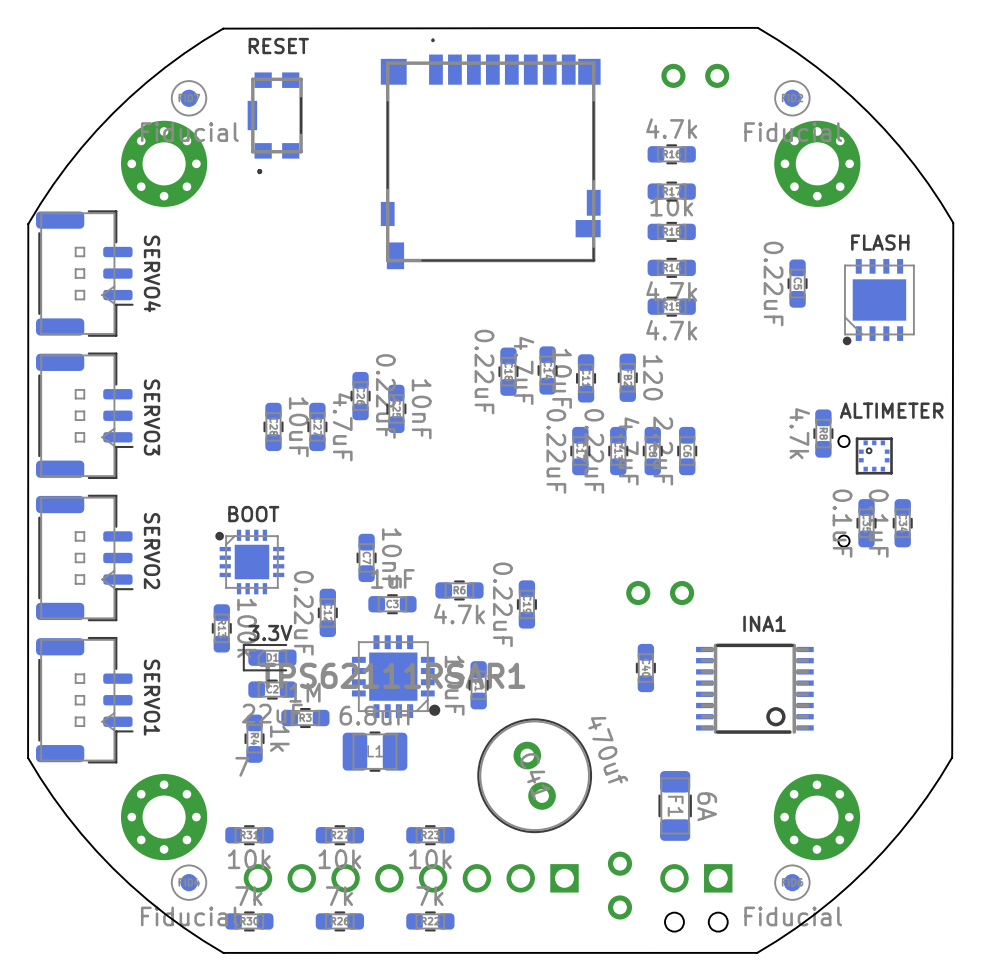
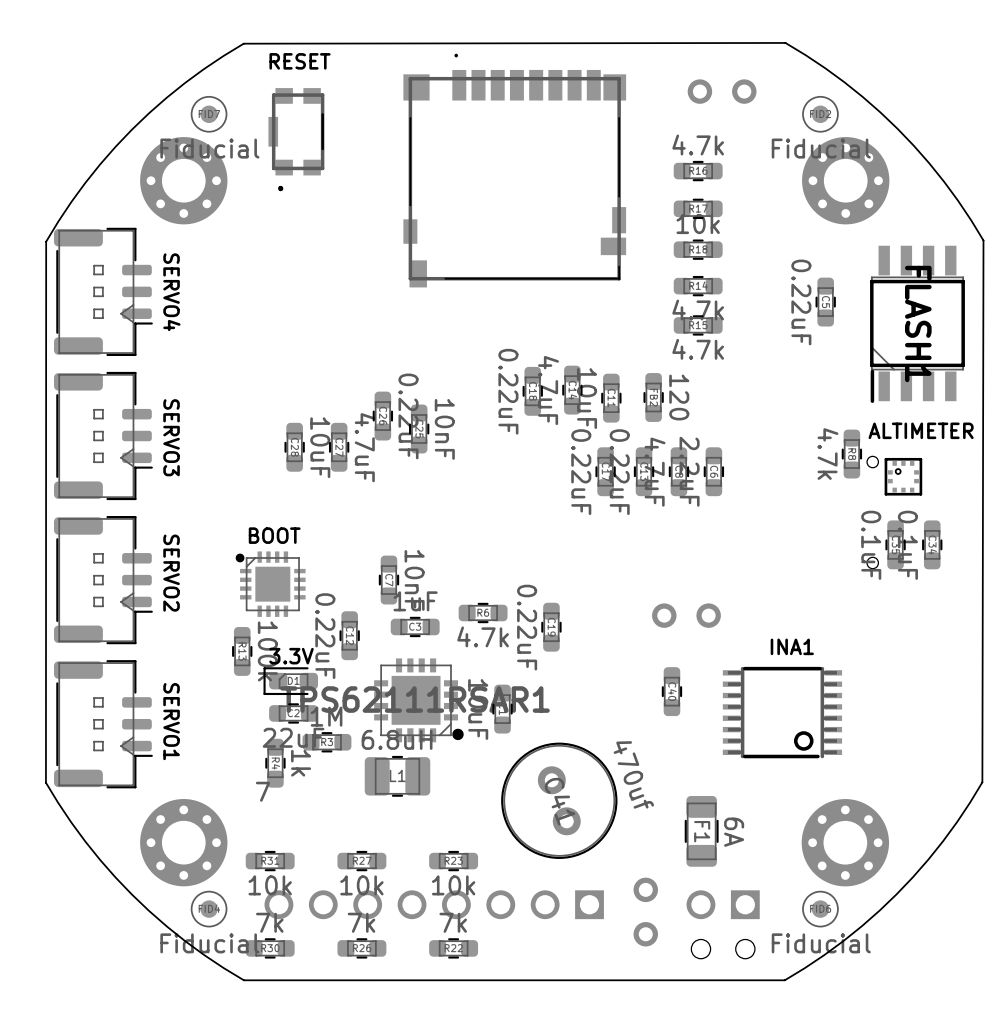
part: FLASH (878, 302) -> none
FLASH1: none -> (917, 324)

